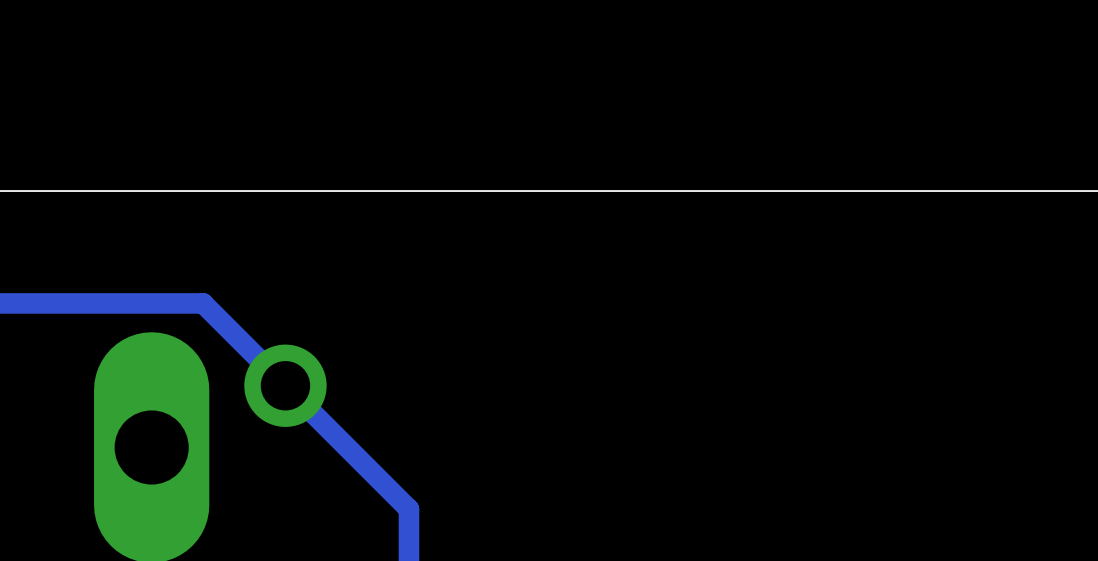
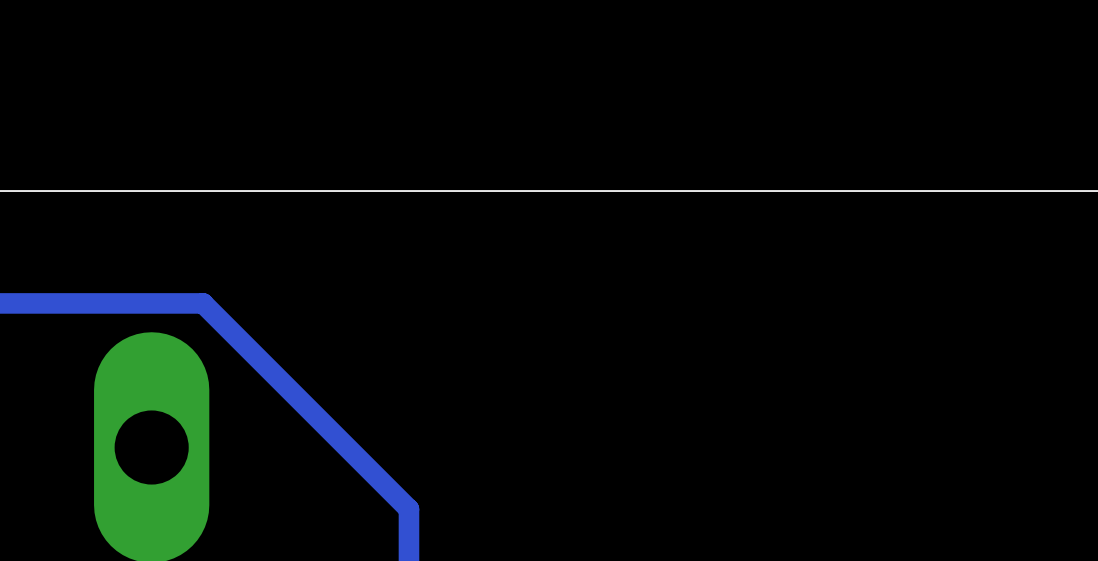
via: (285, 385) -> none

